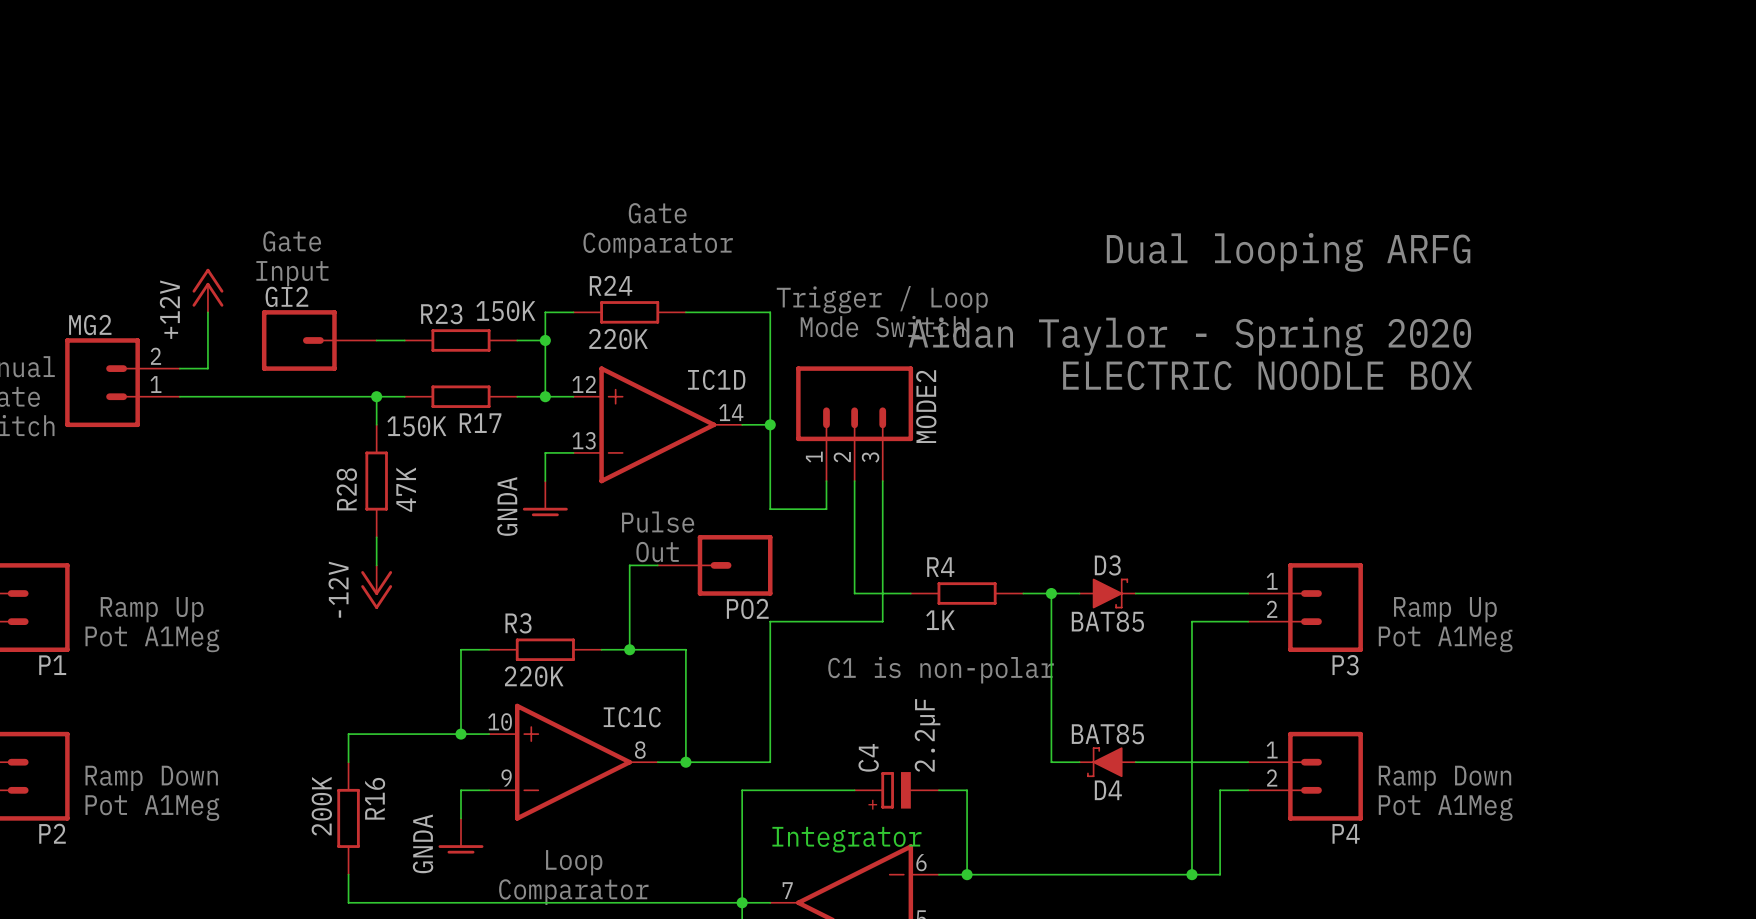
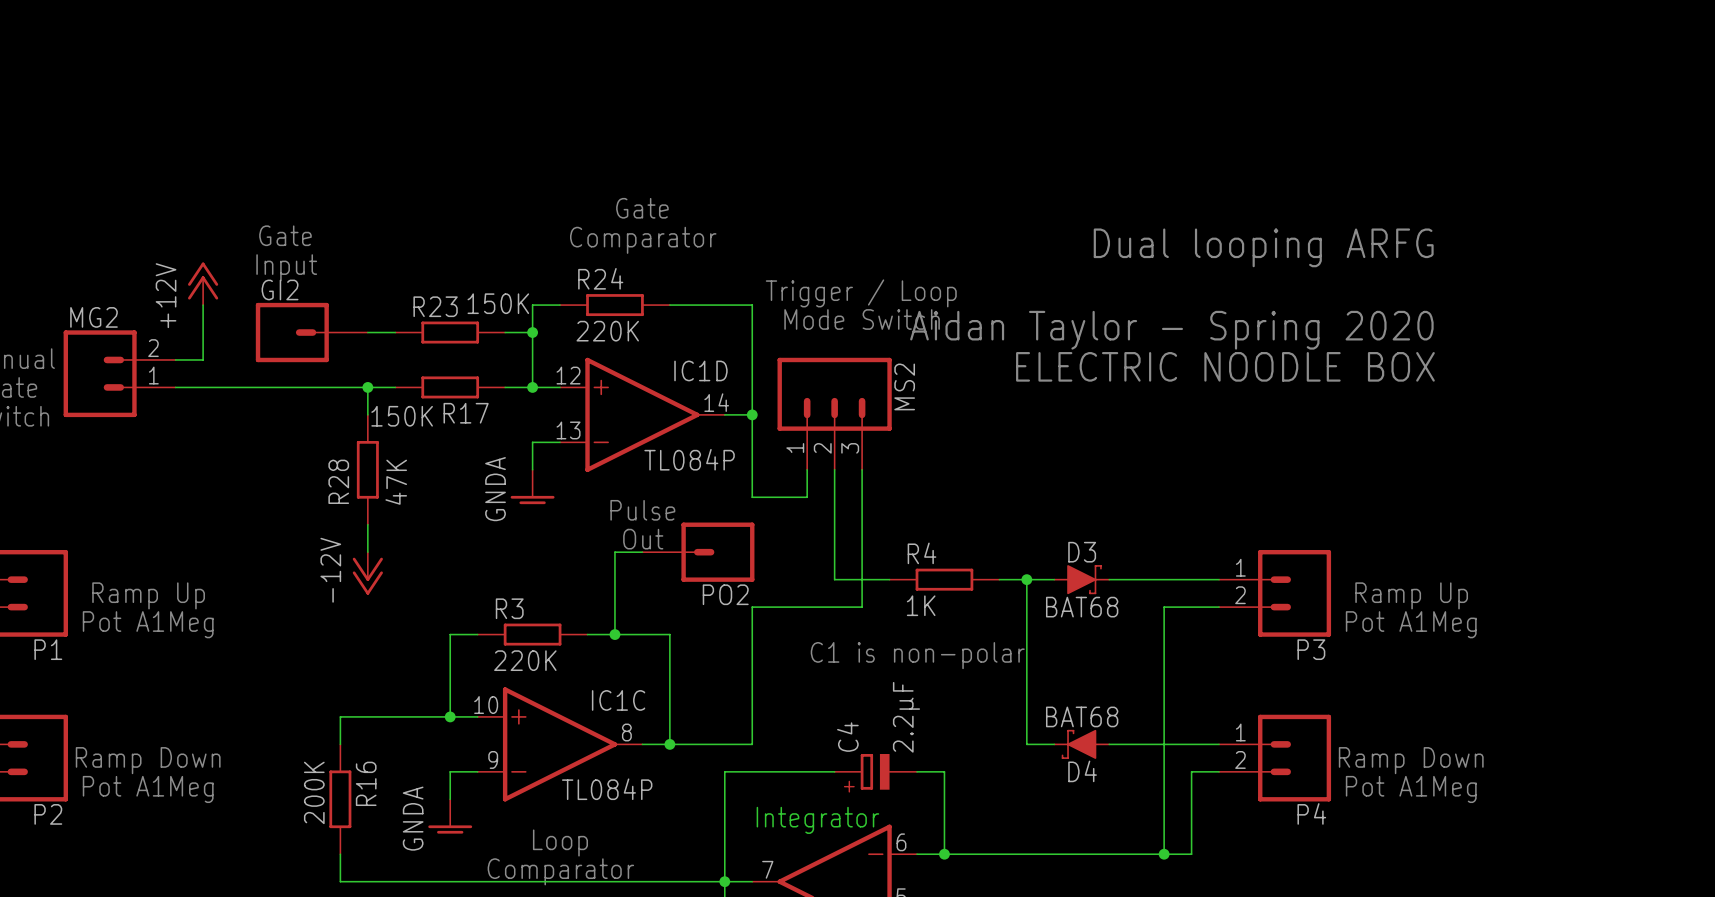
MODE2 name: MODE2 (926, 406) -> MS2 (904, 386)
IC1D value: none -> TL084P (689, 459)
D3 value: BAT85 (1107, 621) -> BAT68 (1082, 607)
D4 value: BAT85 (1107, 734) -> BAT68 (1082, 716)
IC1C value: none -> TL084P (607, 789)

